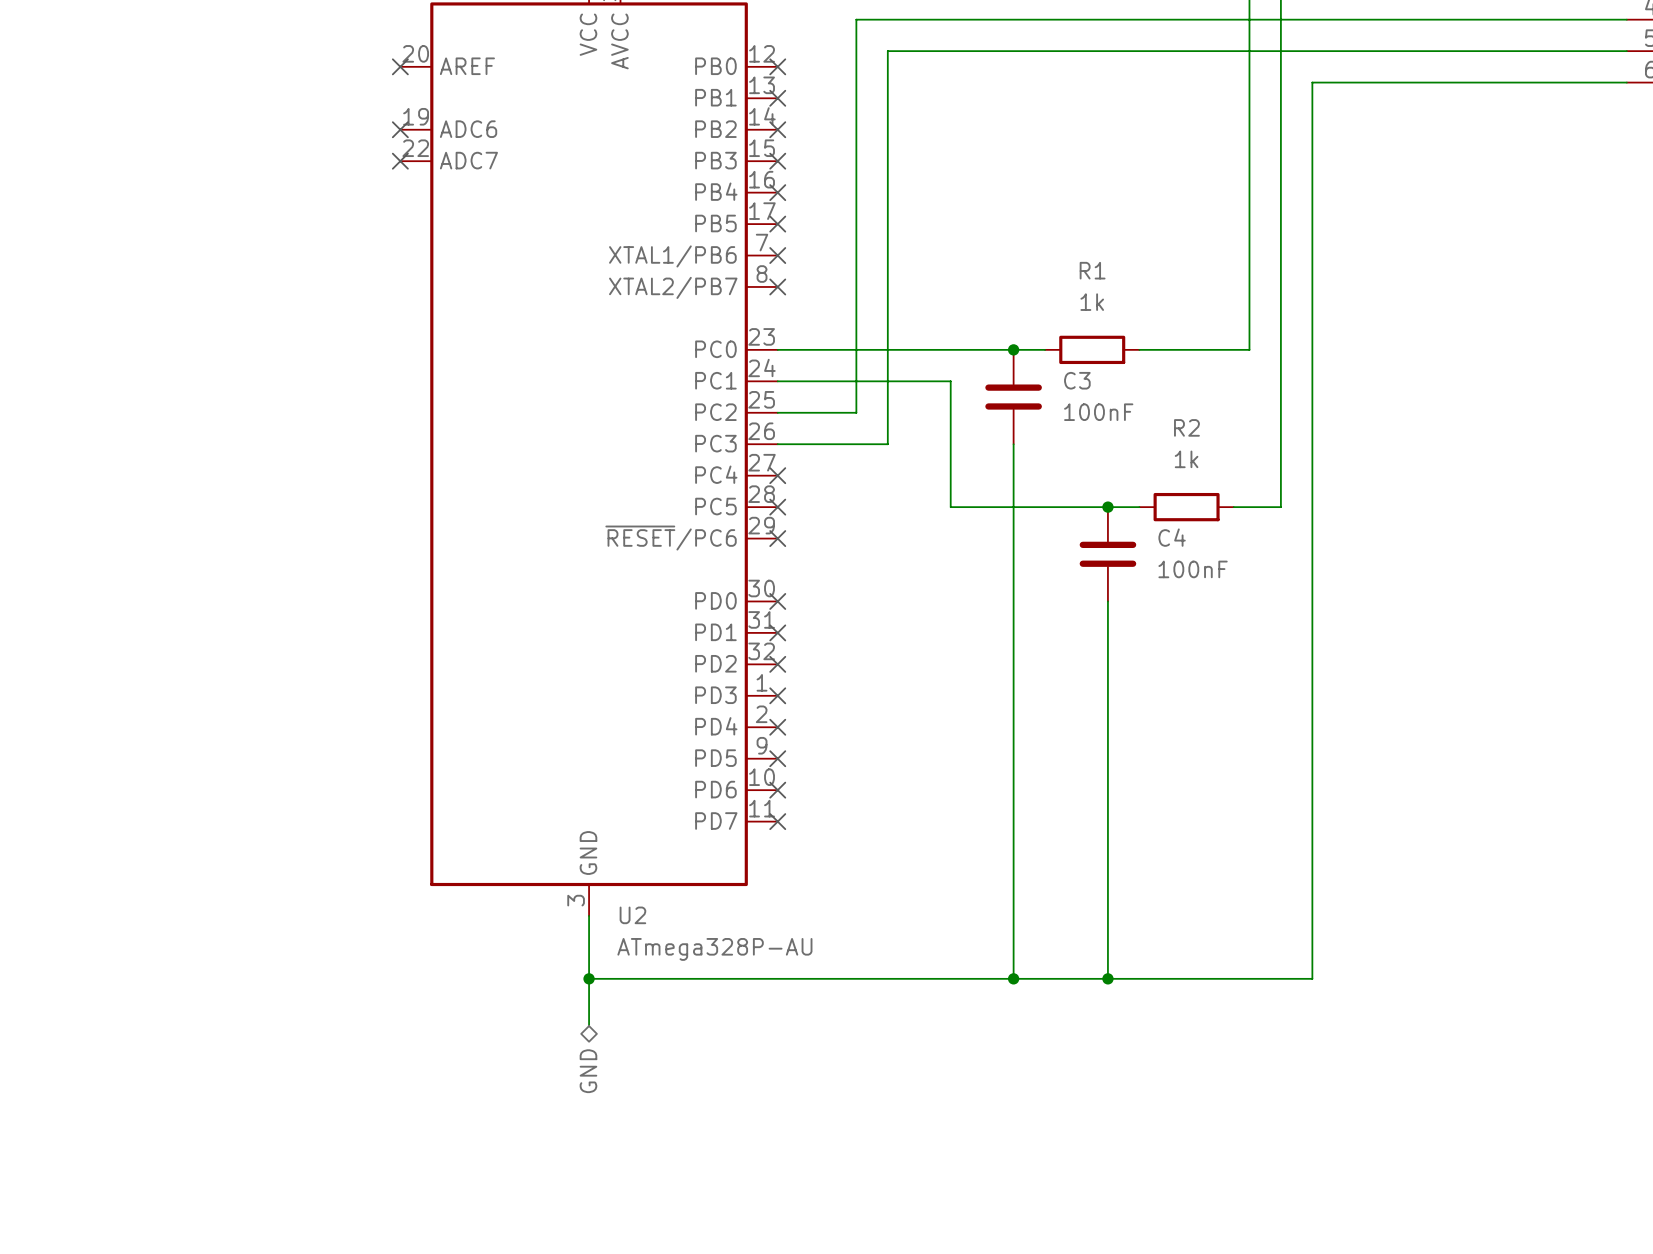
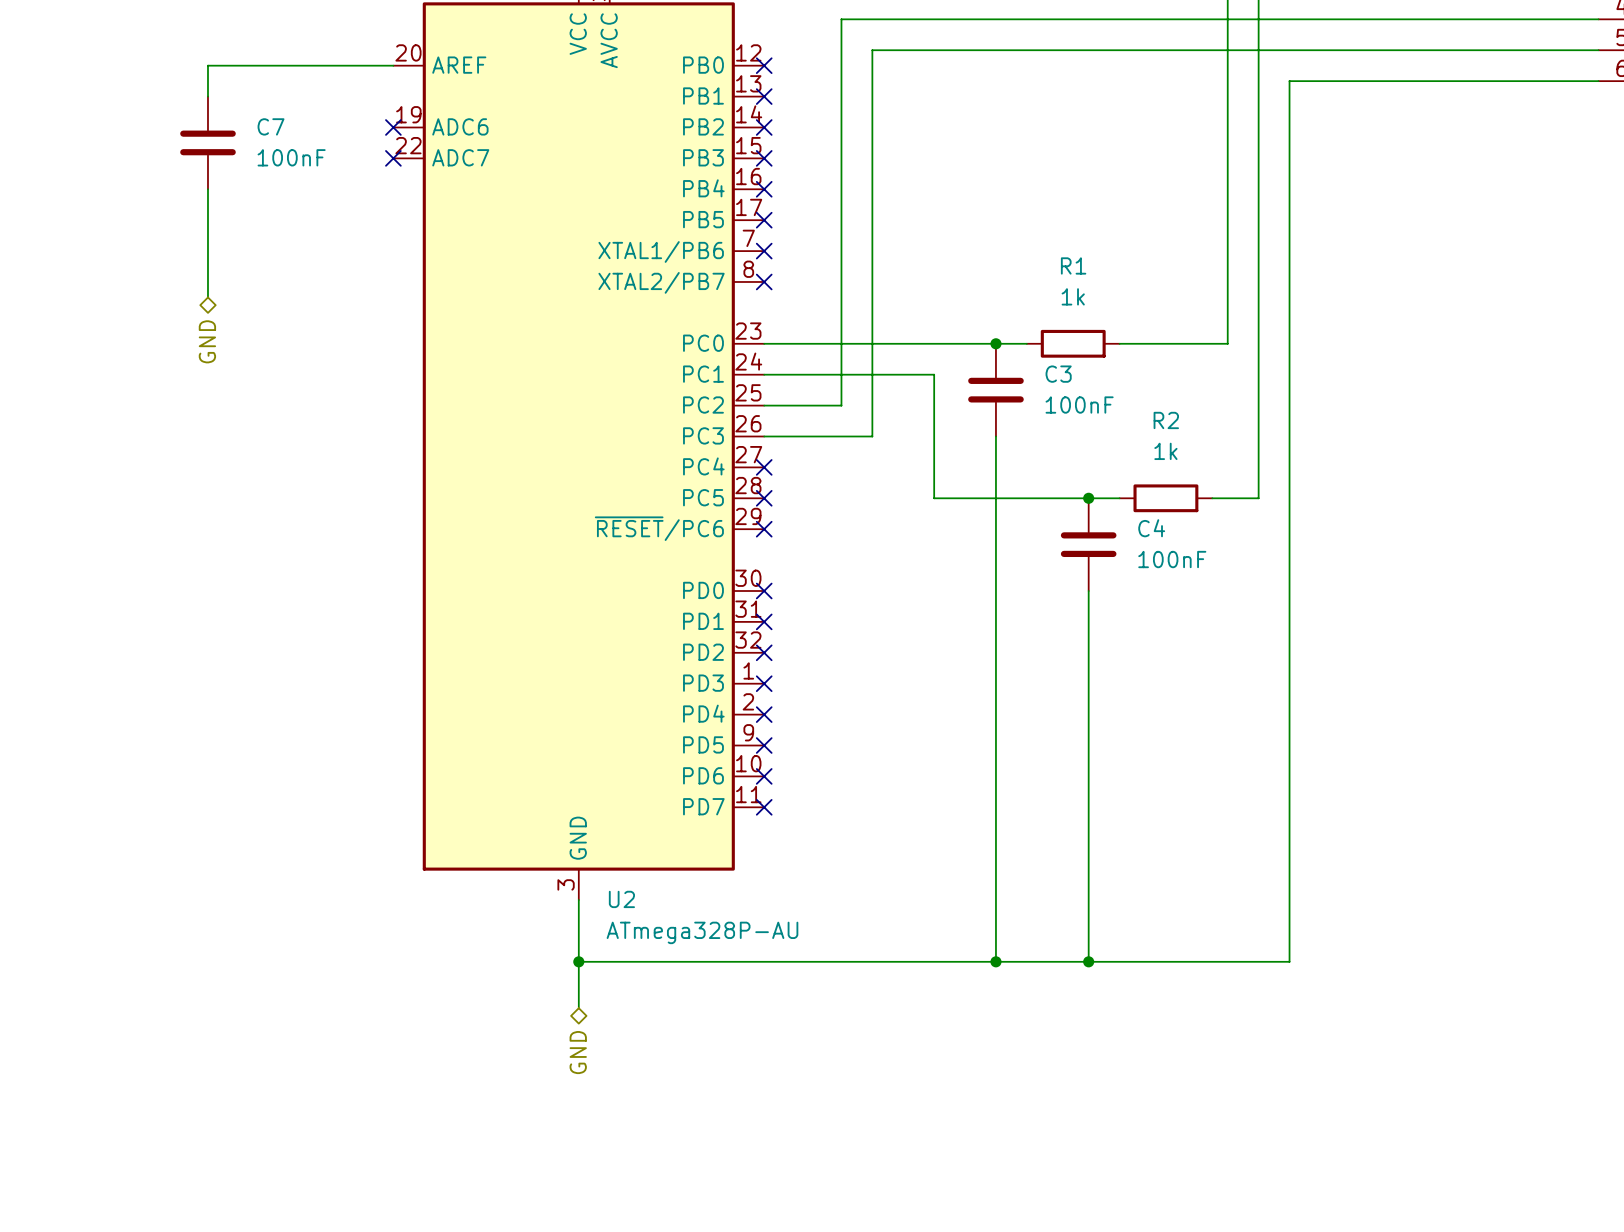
wire: none -> (393, 65) (207, 65) (207, 96)
no-connect mark: (400, 66) -> none
C7: none -> 100nF (207, 142)
wire: none -> (207, 189) (207, 297)
hierarchical label: none -> GND (207, 341)

